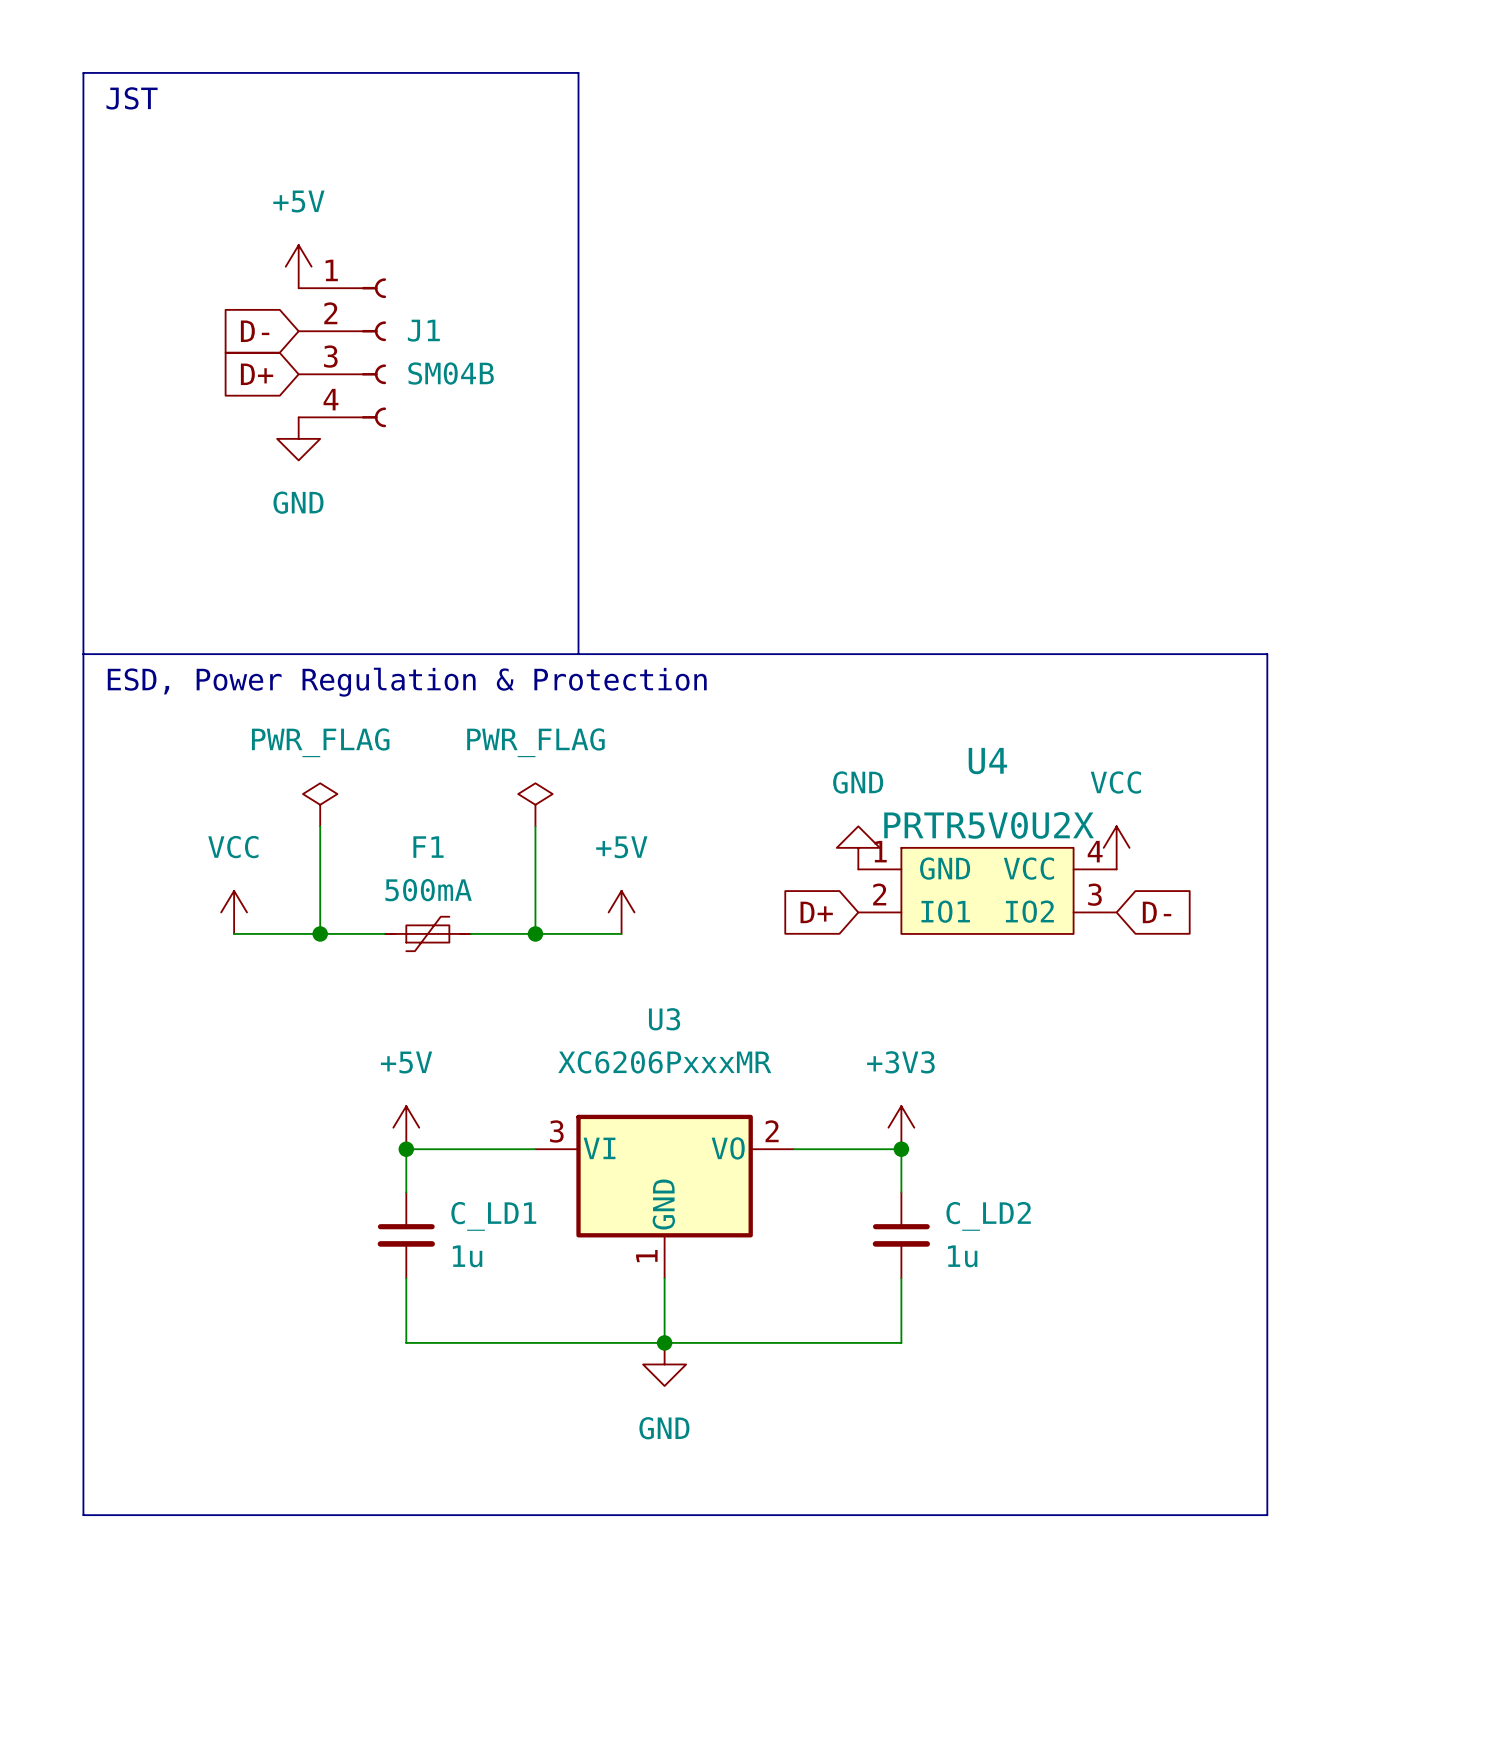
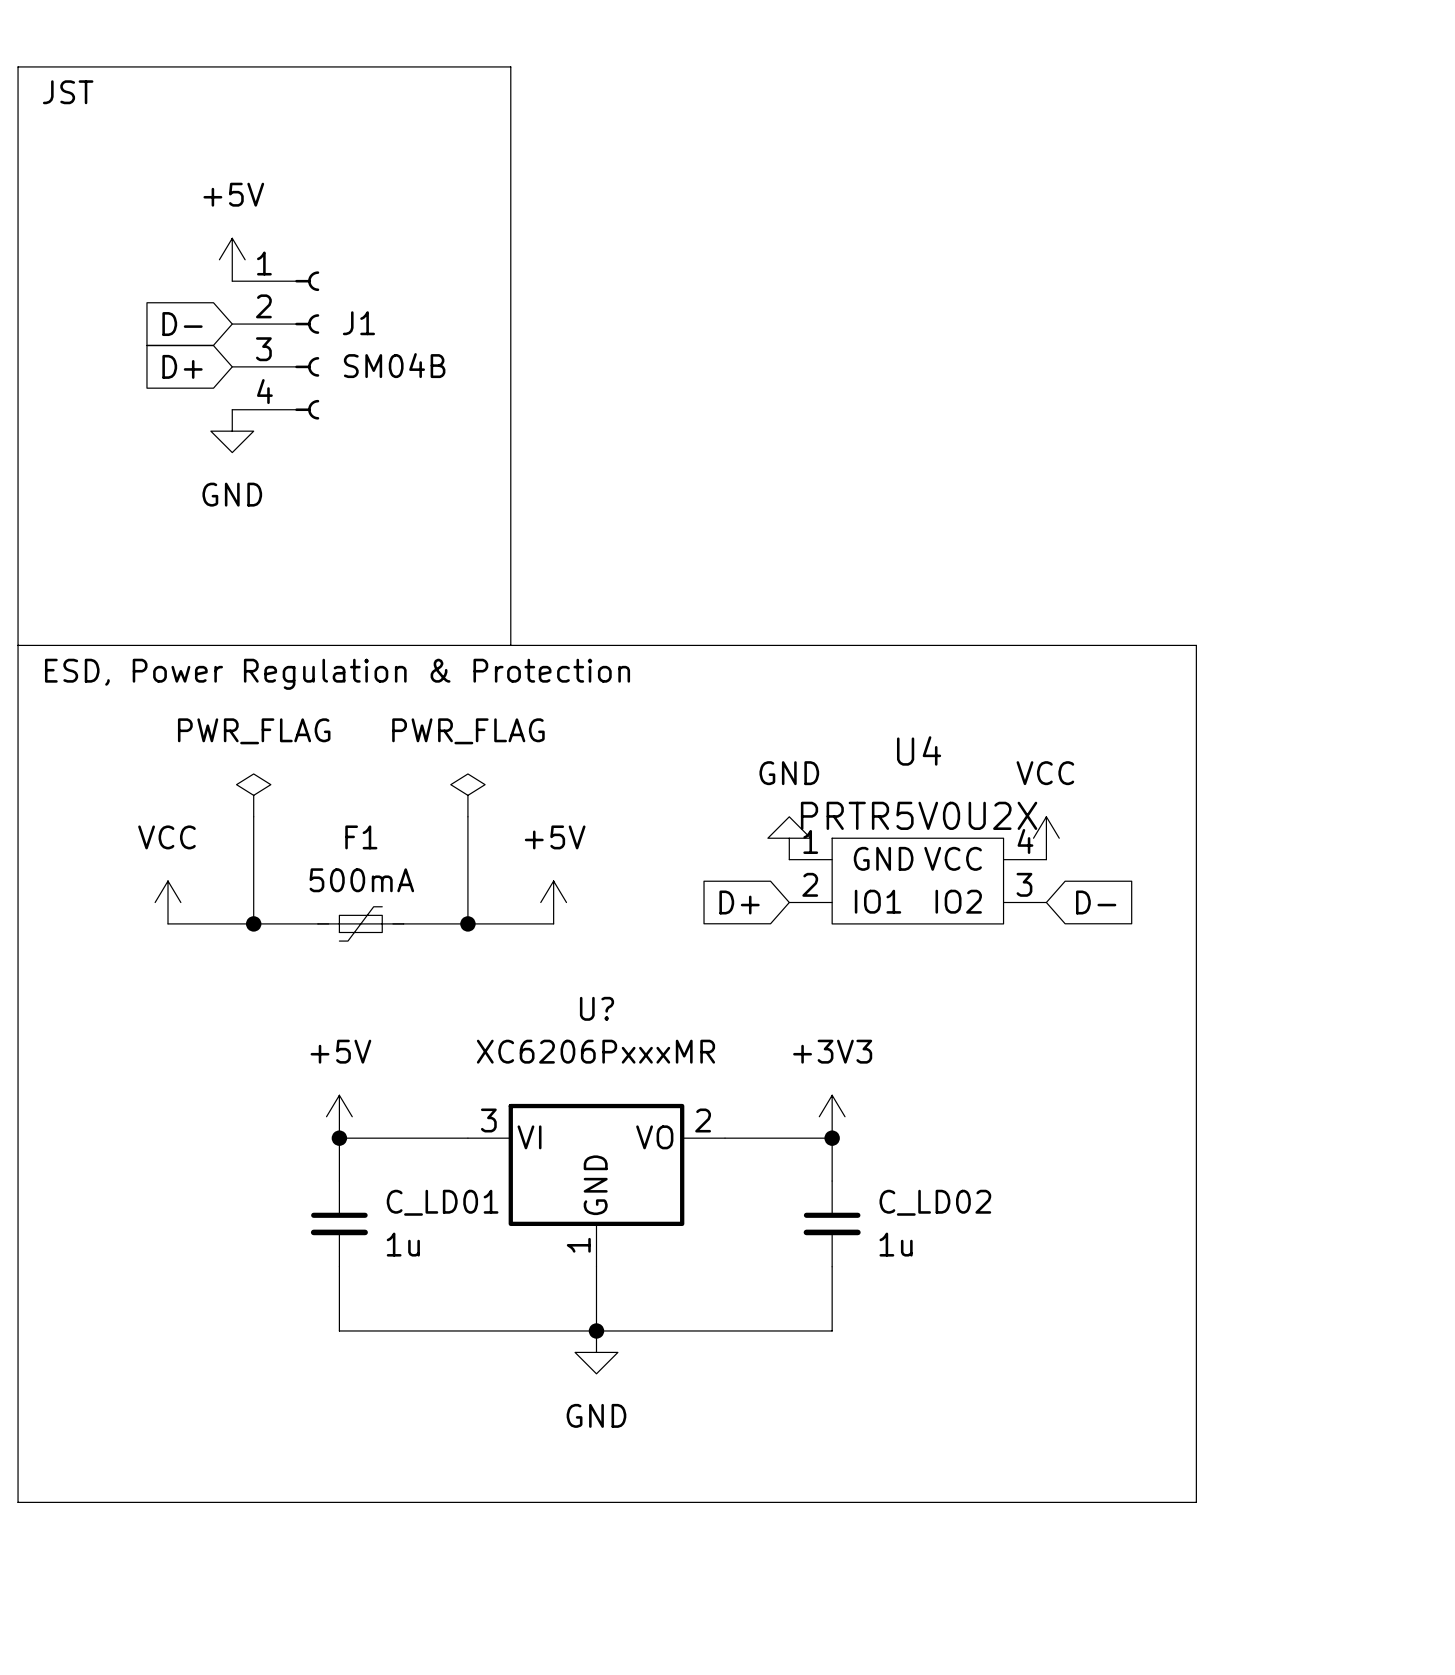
U3 name: U3 (664, 1019) -> U? (596, 1008)
C_LD1 name: C_LD1 (493, 1216) -> C_LD01 (442, 1202)
C_LD2 name: C_LD2 (988, 1216) -> C_LD02 (935, 1202)

